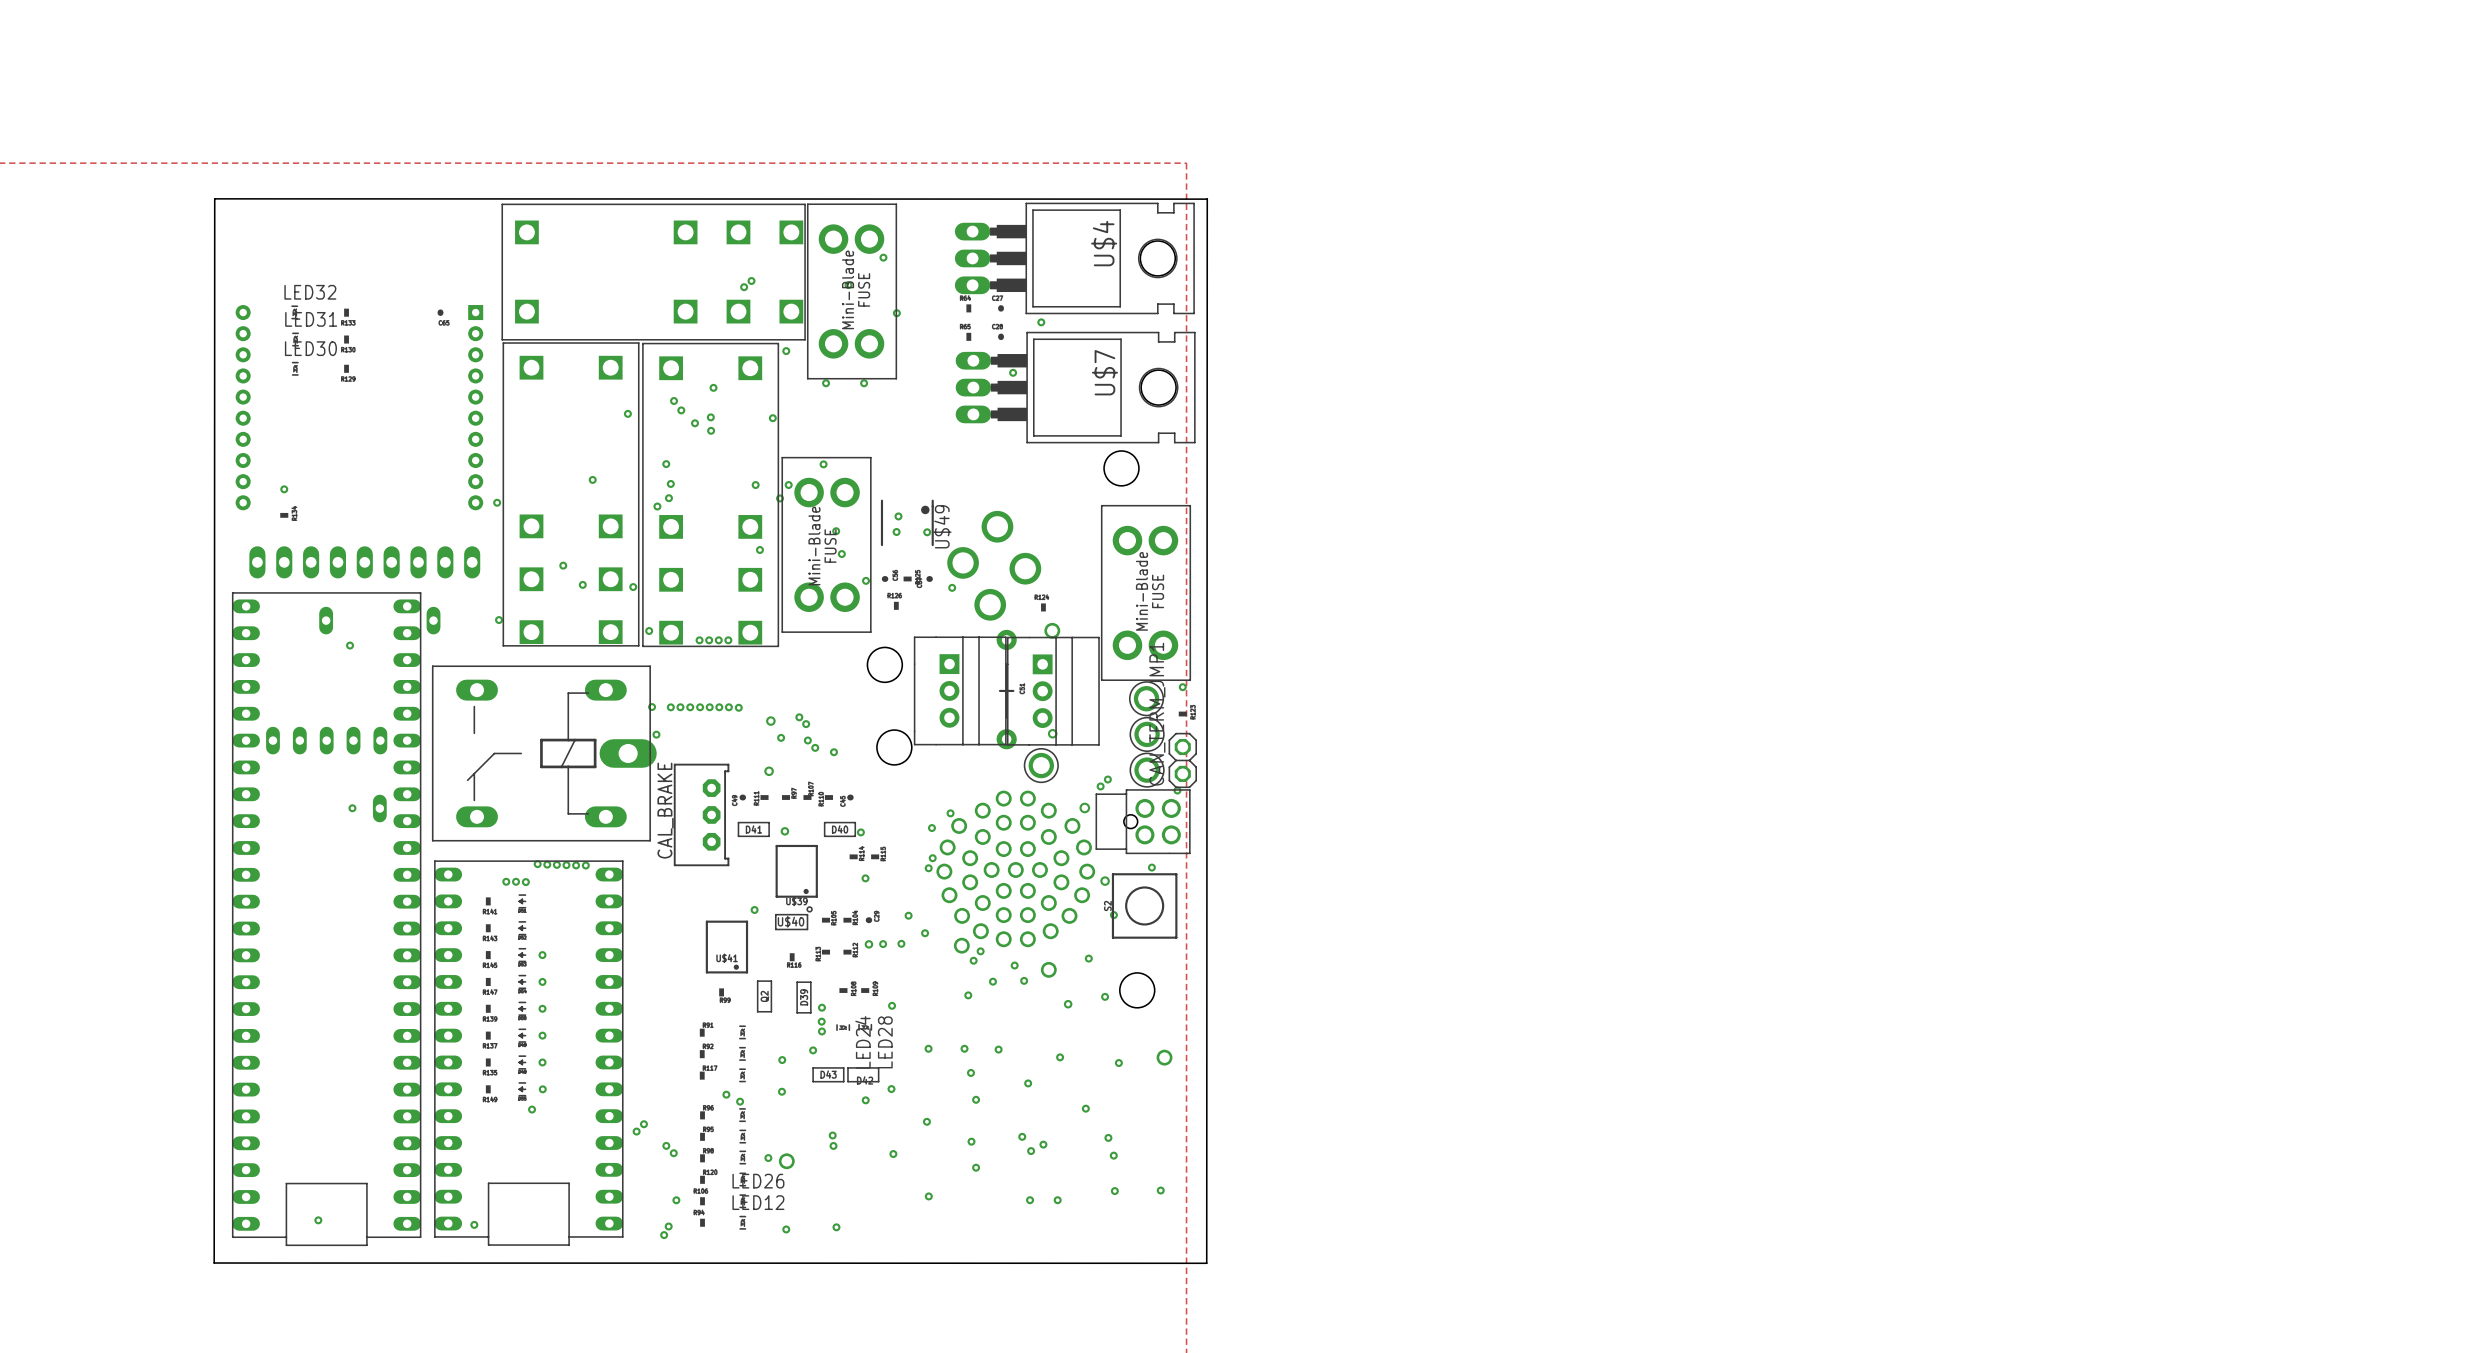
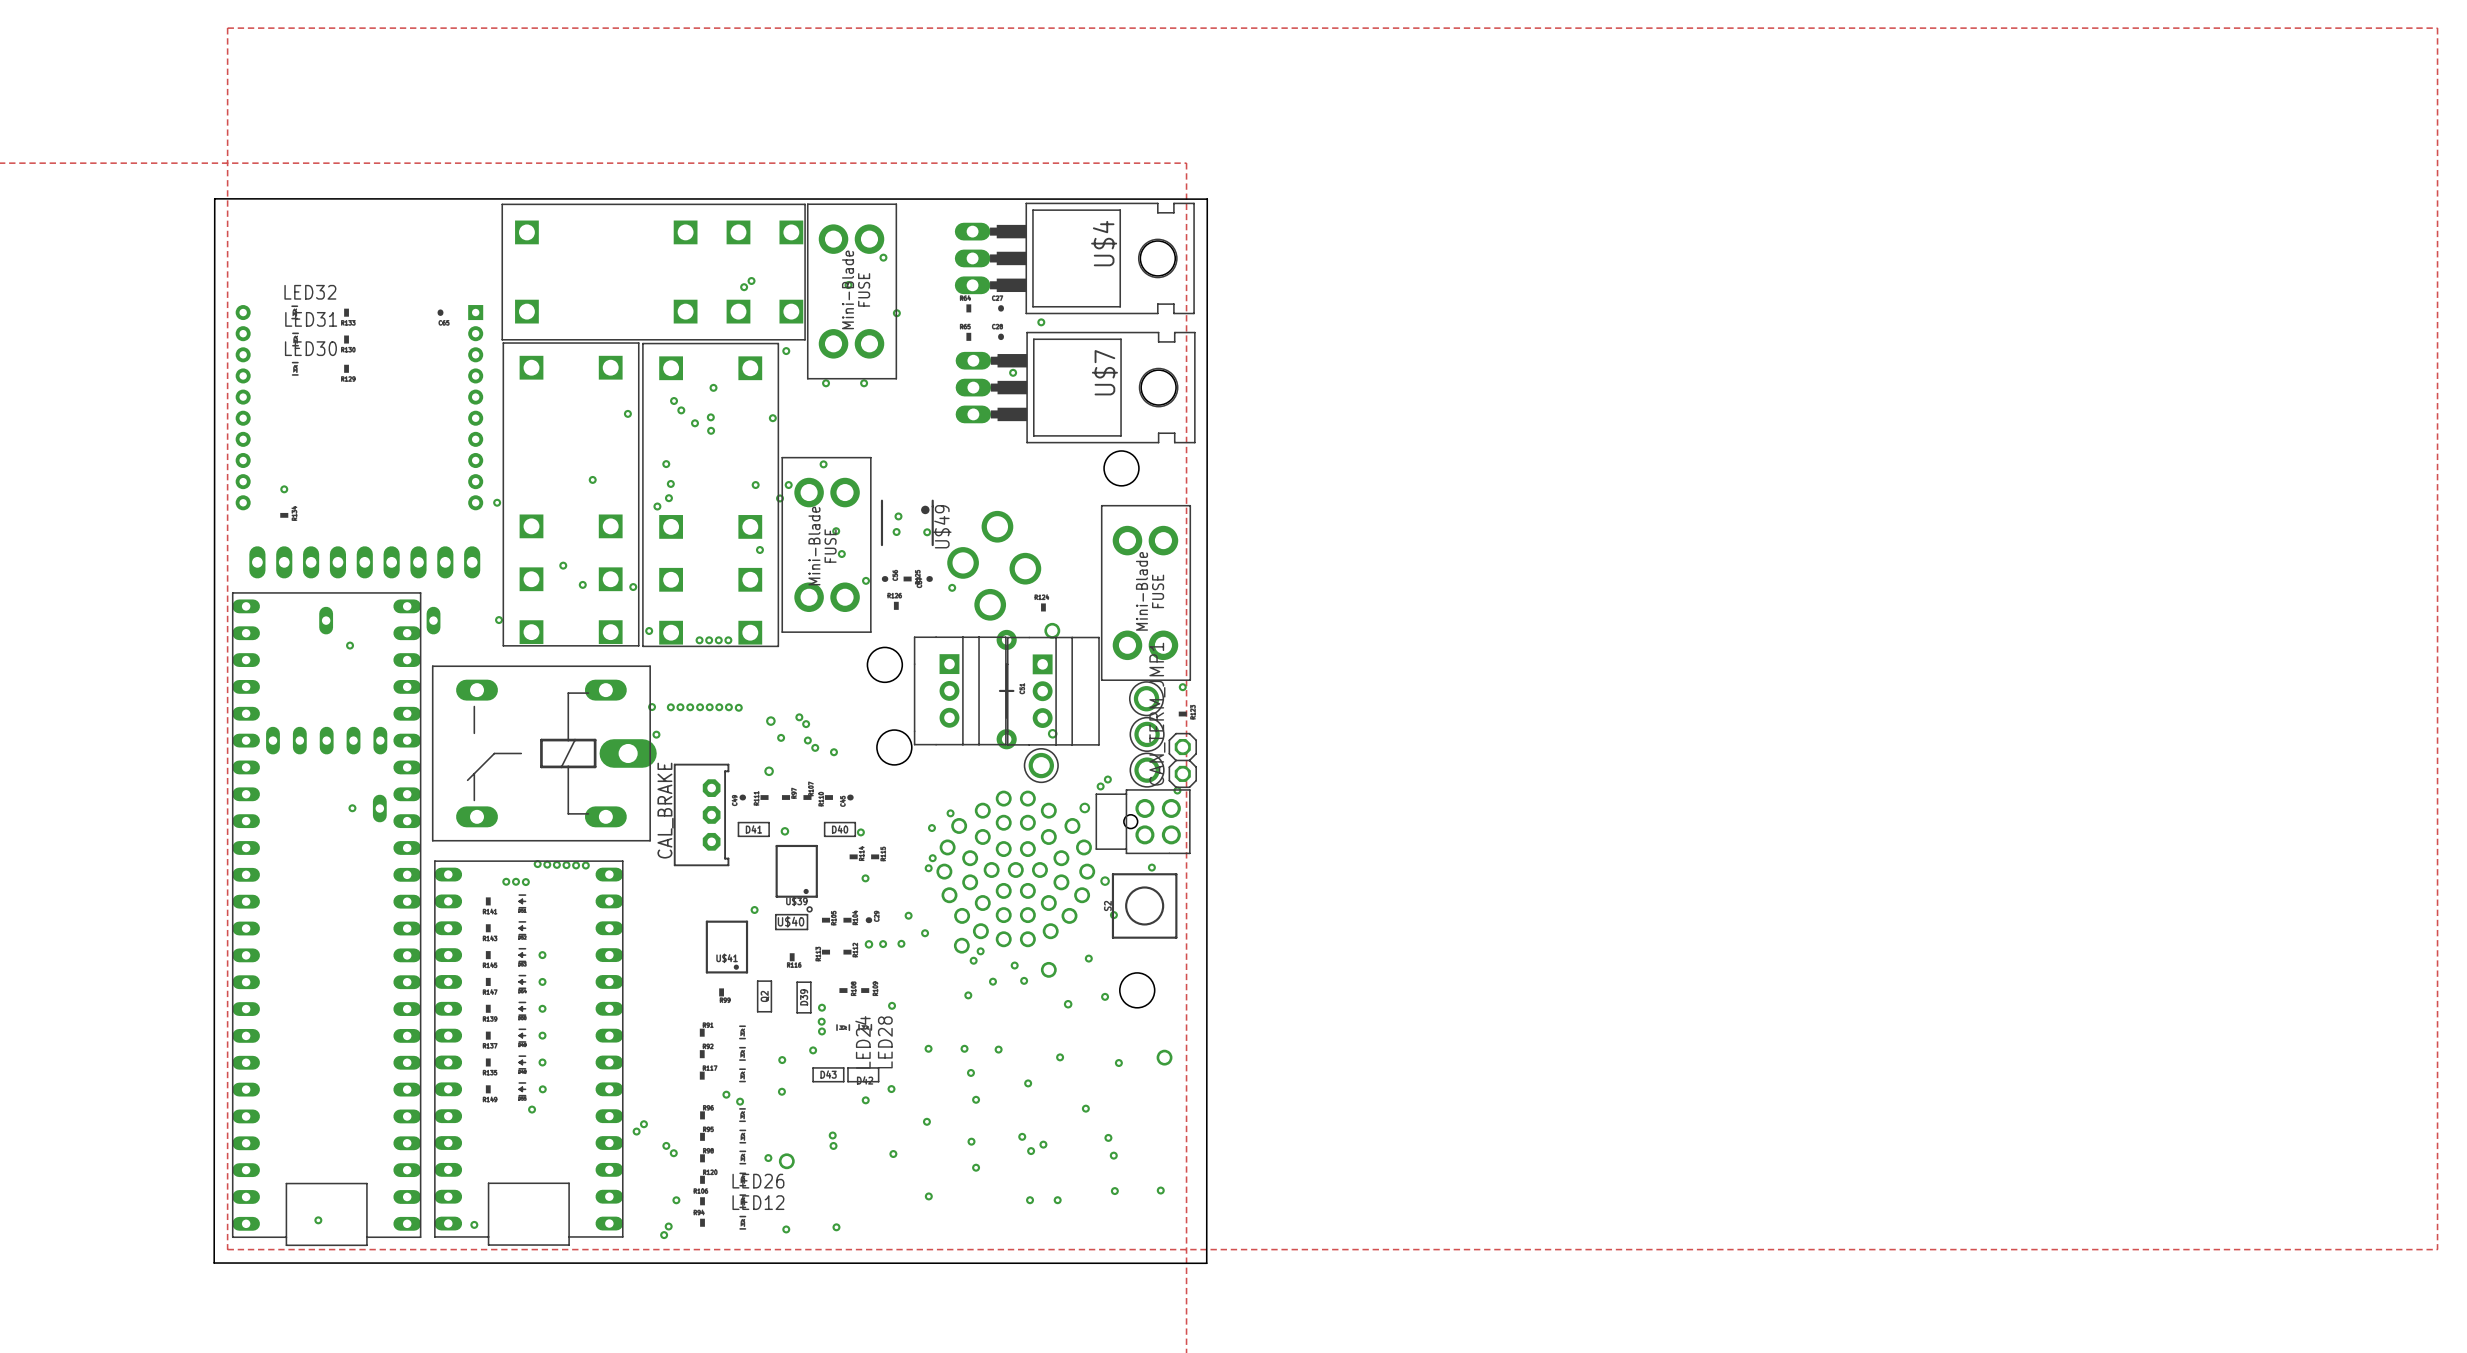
zone outline: none -> (227, 28) (2437, 28) (2437, 1249) (227, 1249) (227, 28)

